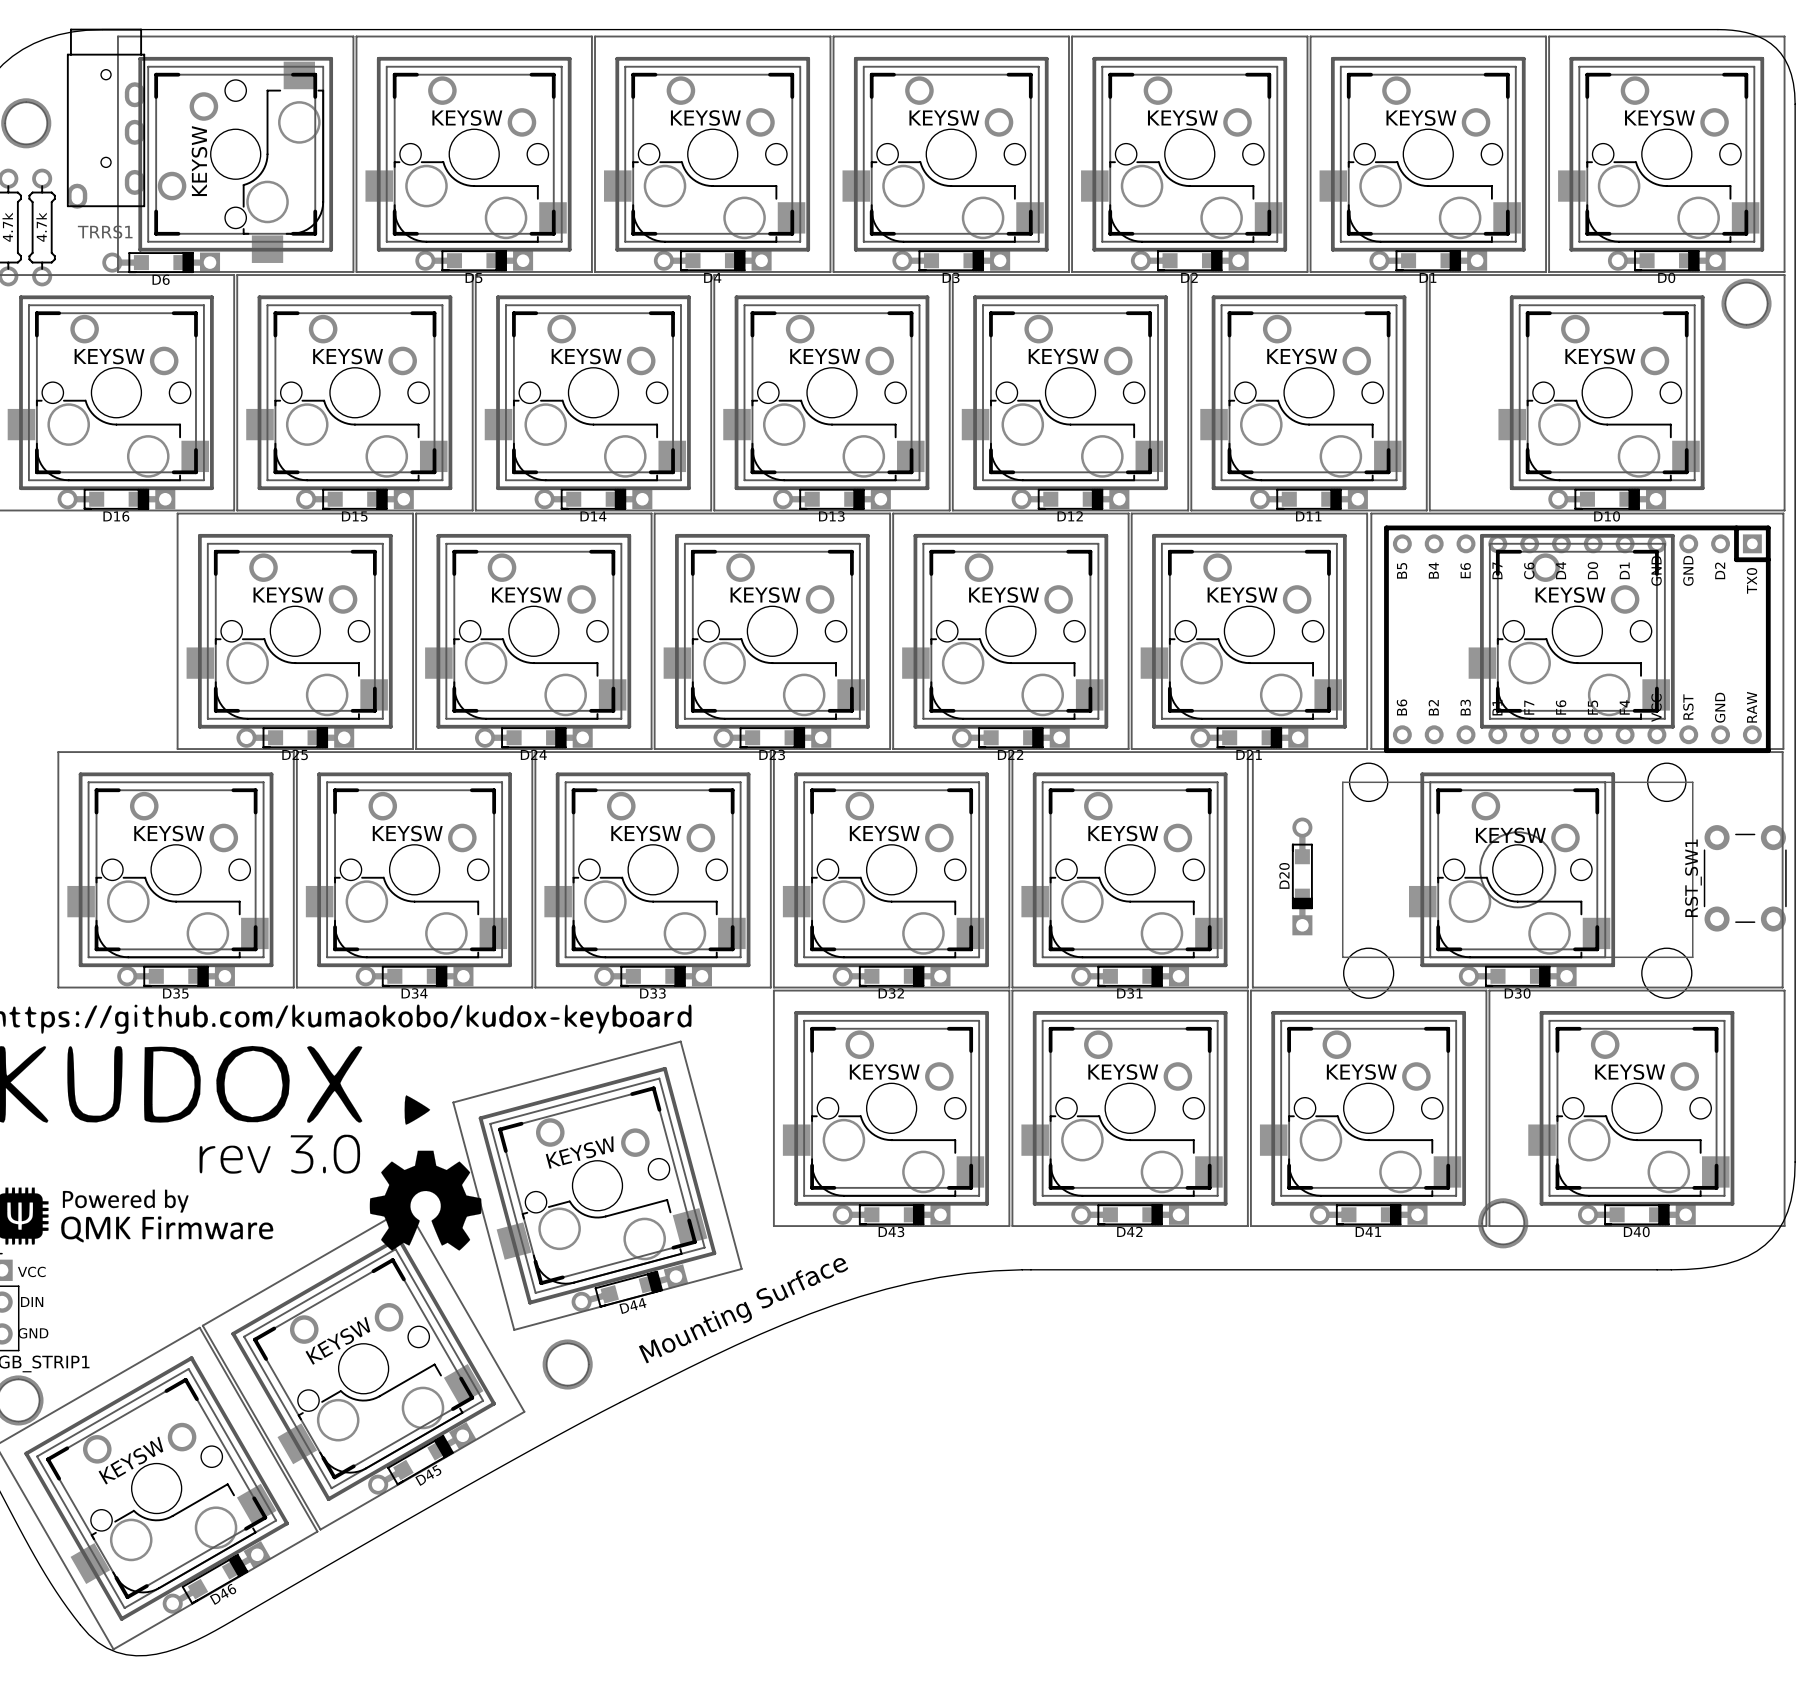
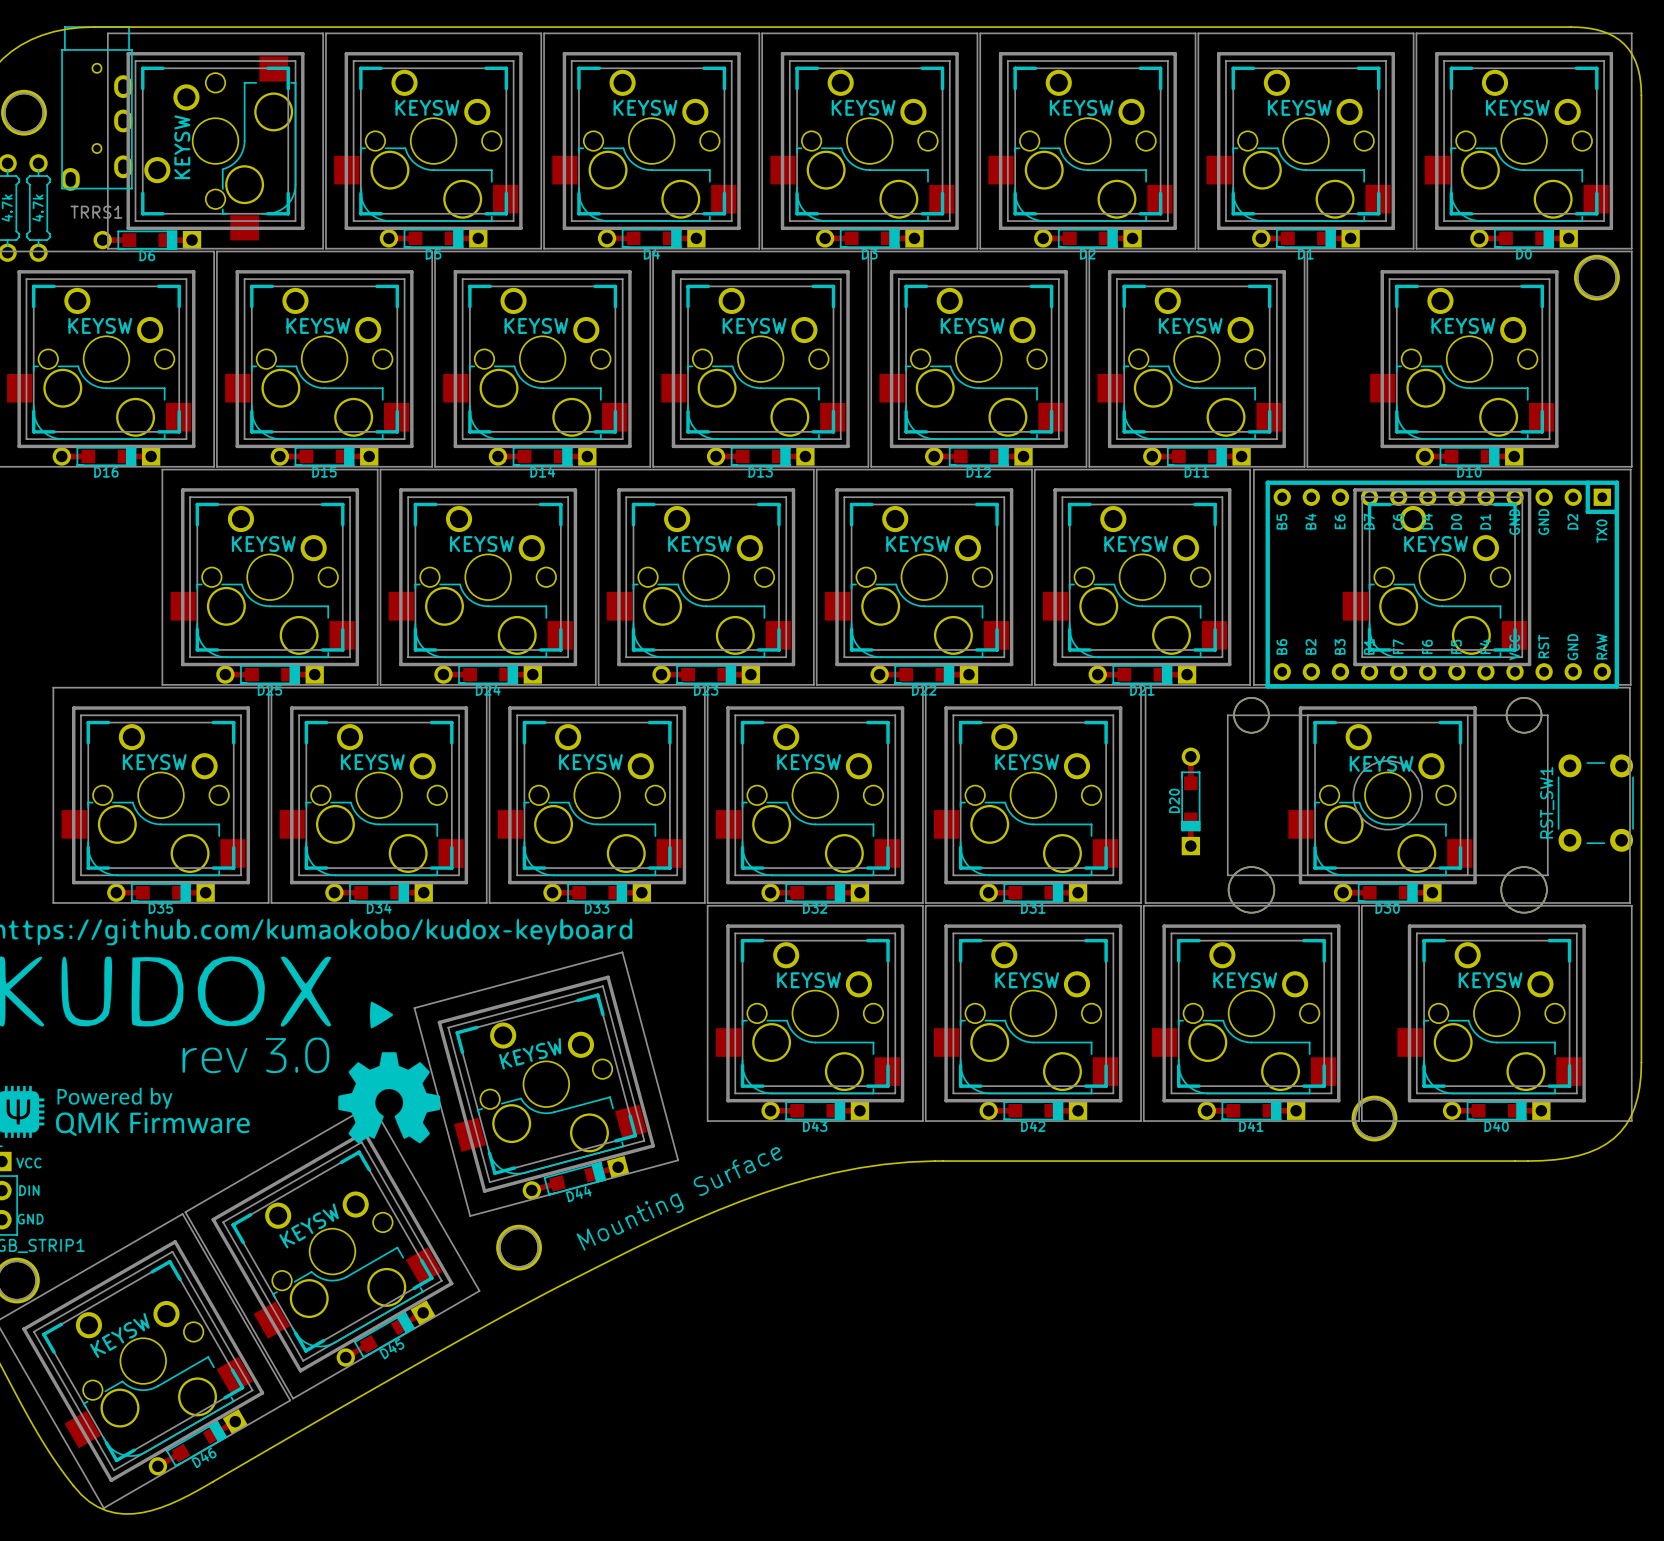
drawing: none -> [1233, 697, 1270, 734]
drawing: none -> [1506, 697, 1543, 734]
drawing: none -> [1228, 866, 1275, 914]
drawing: none -> [1500, 866, 1548, 914]

